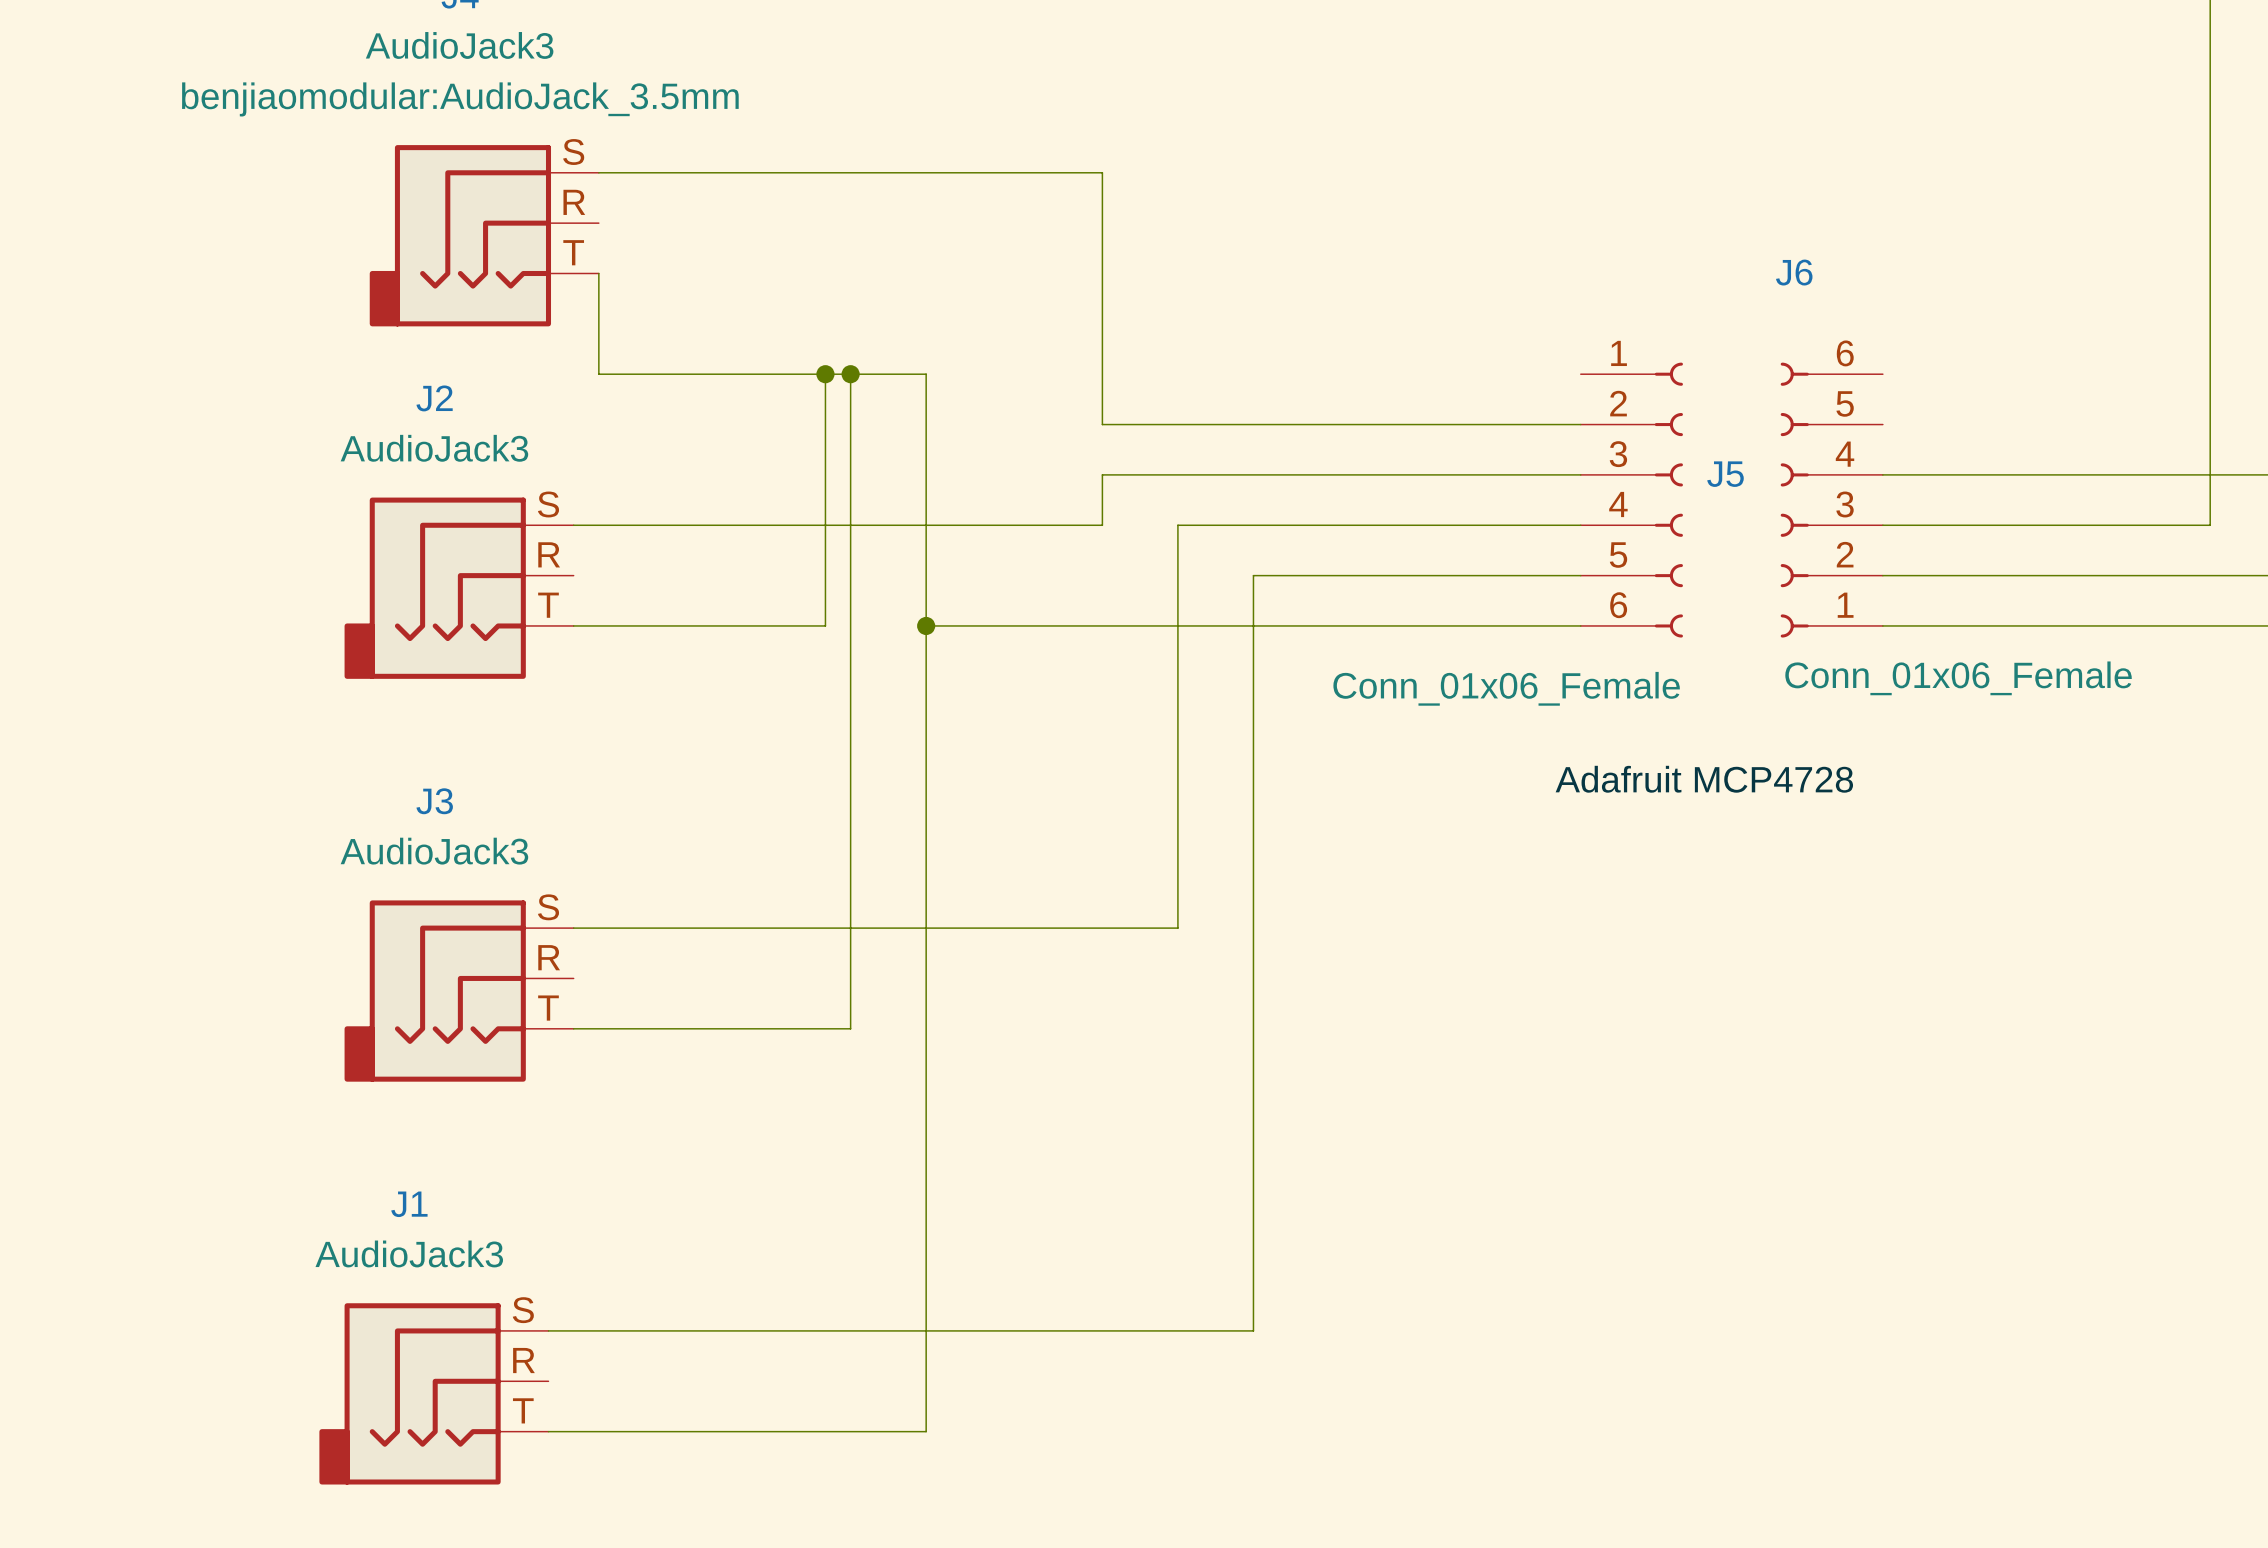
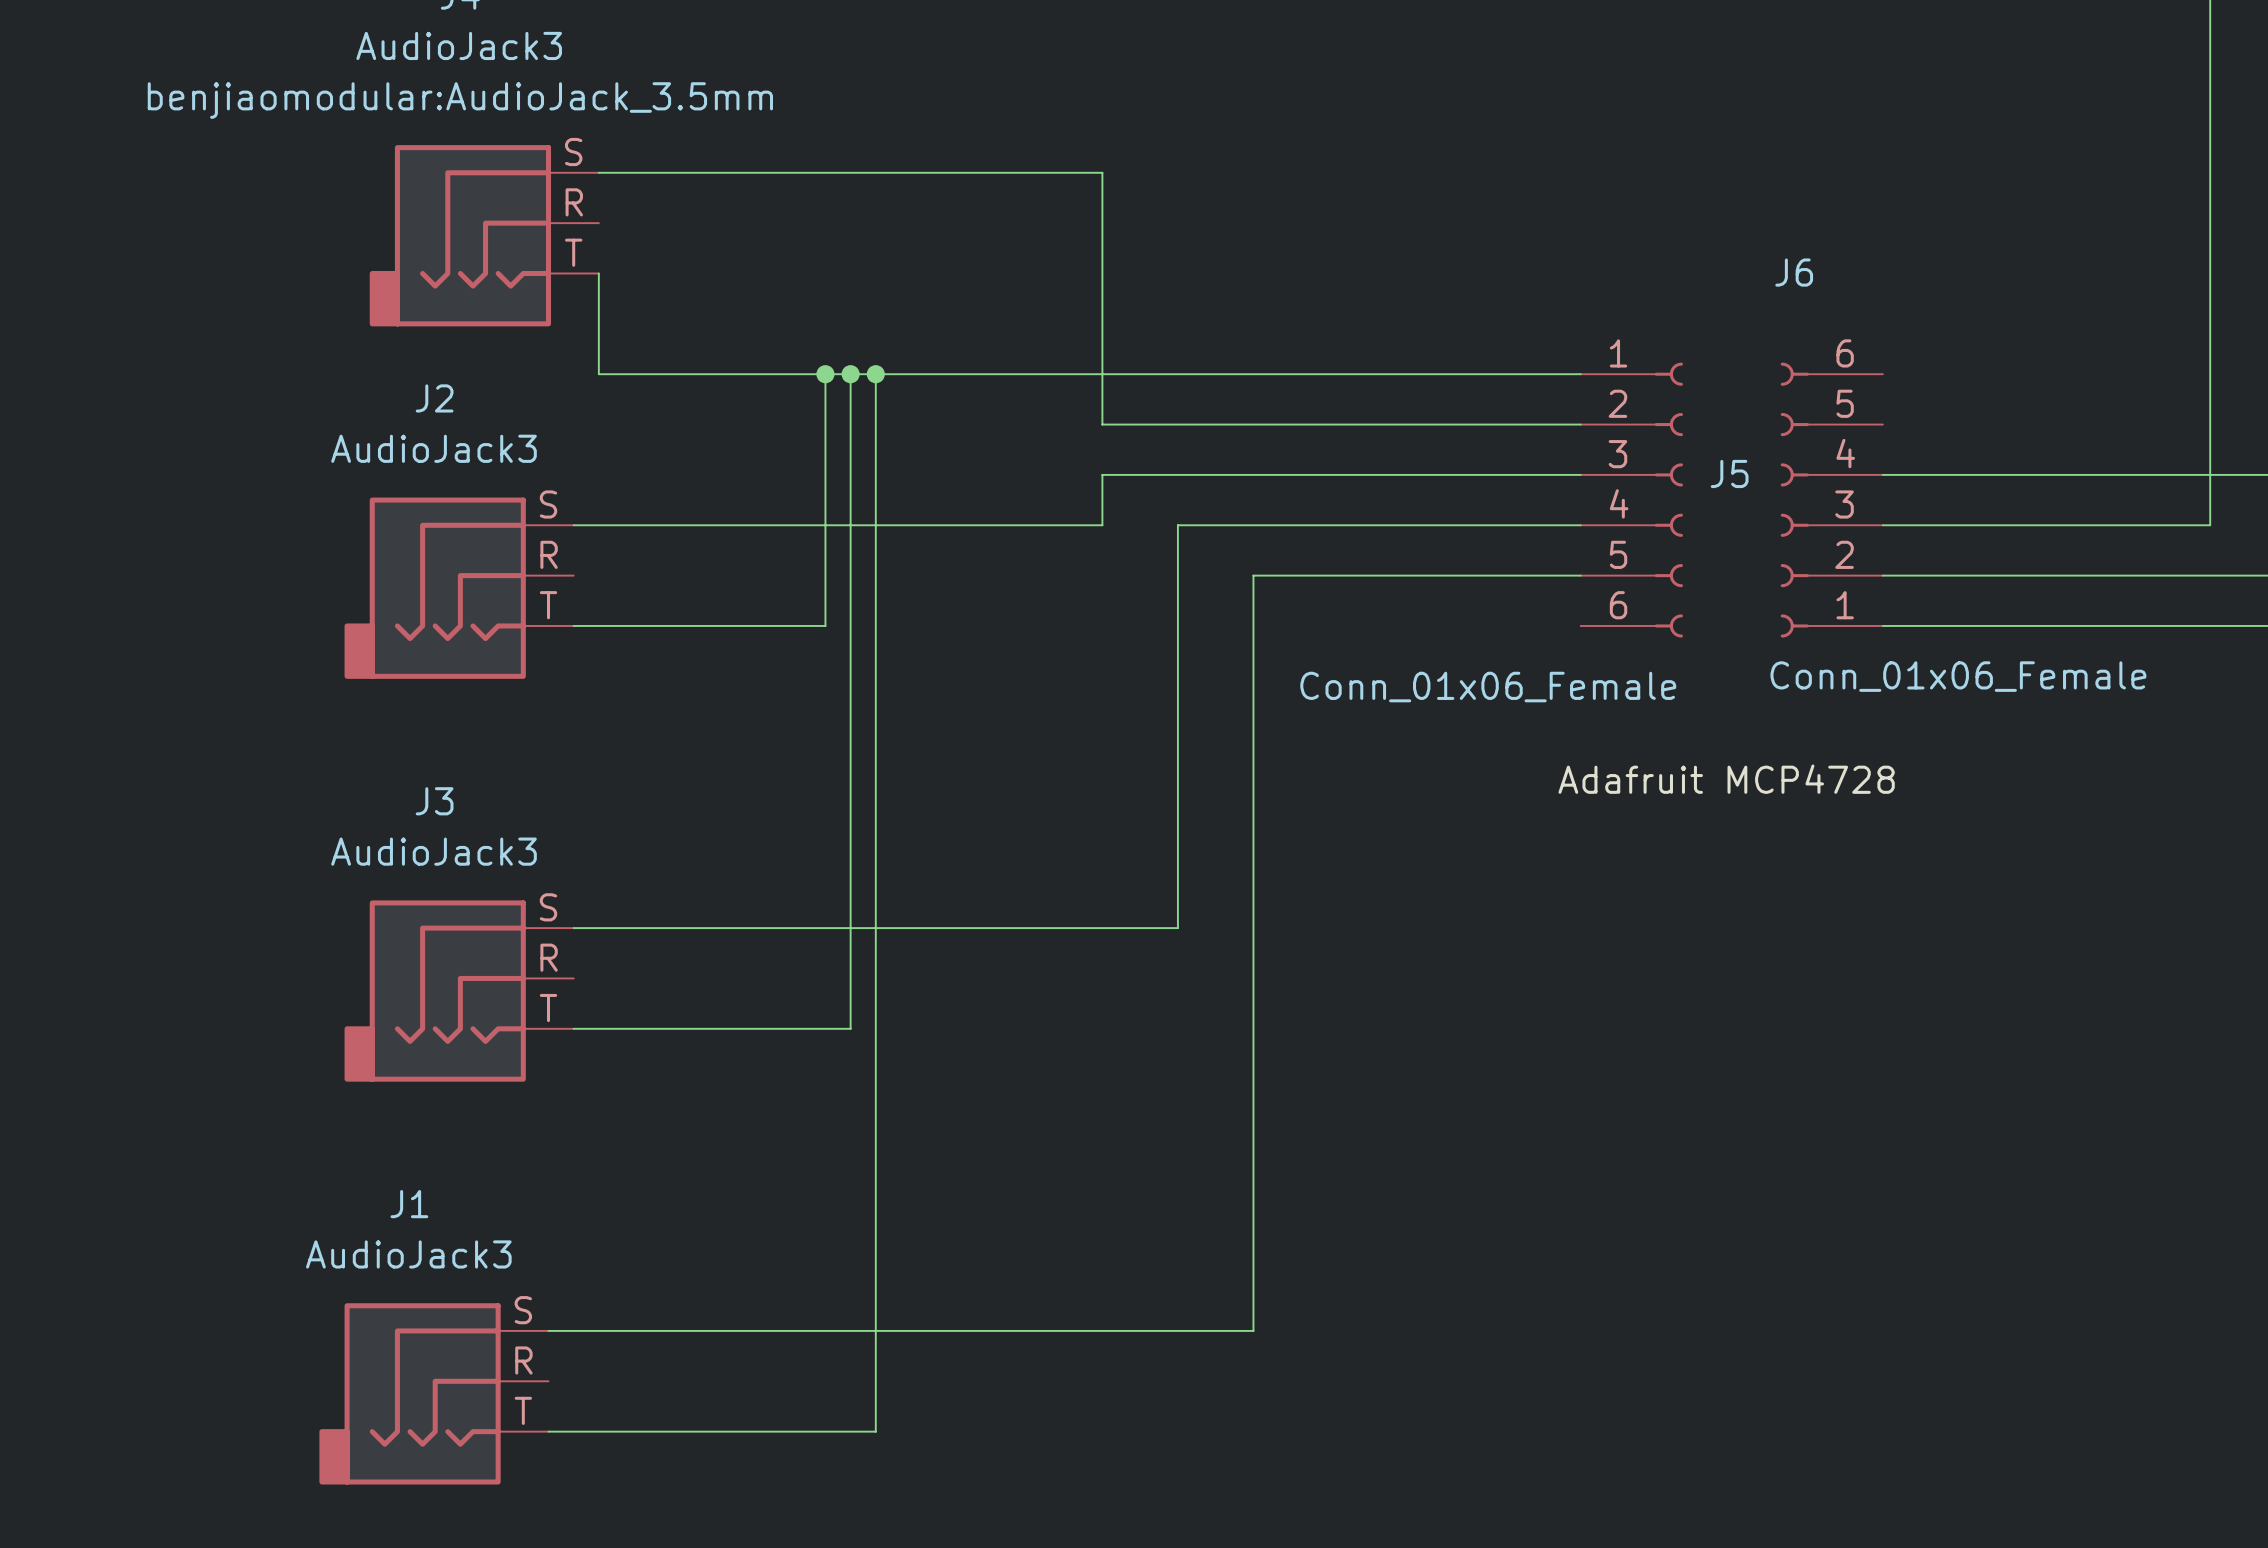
junction: none -> (875, 374)
wire: (926, 374) (926, 1431) (875, 1431) -> (875, 374) (875, 1431)
wire: (926, 625) (1580, 625) -> (926, 374) (1580, 374)
junction: (926, 625) -> none

